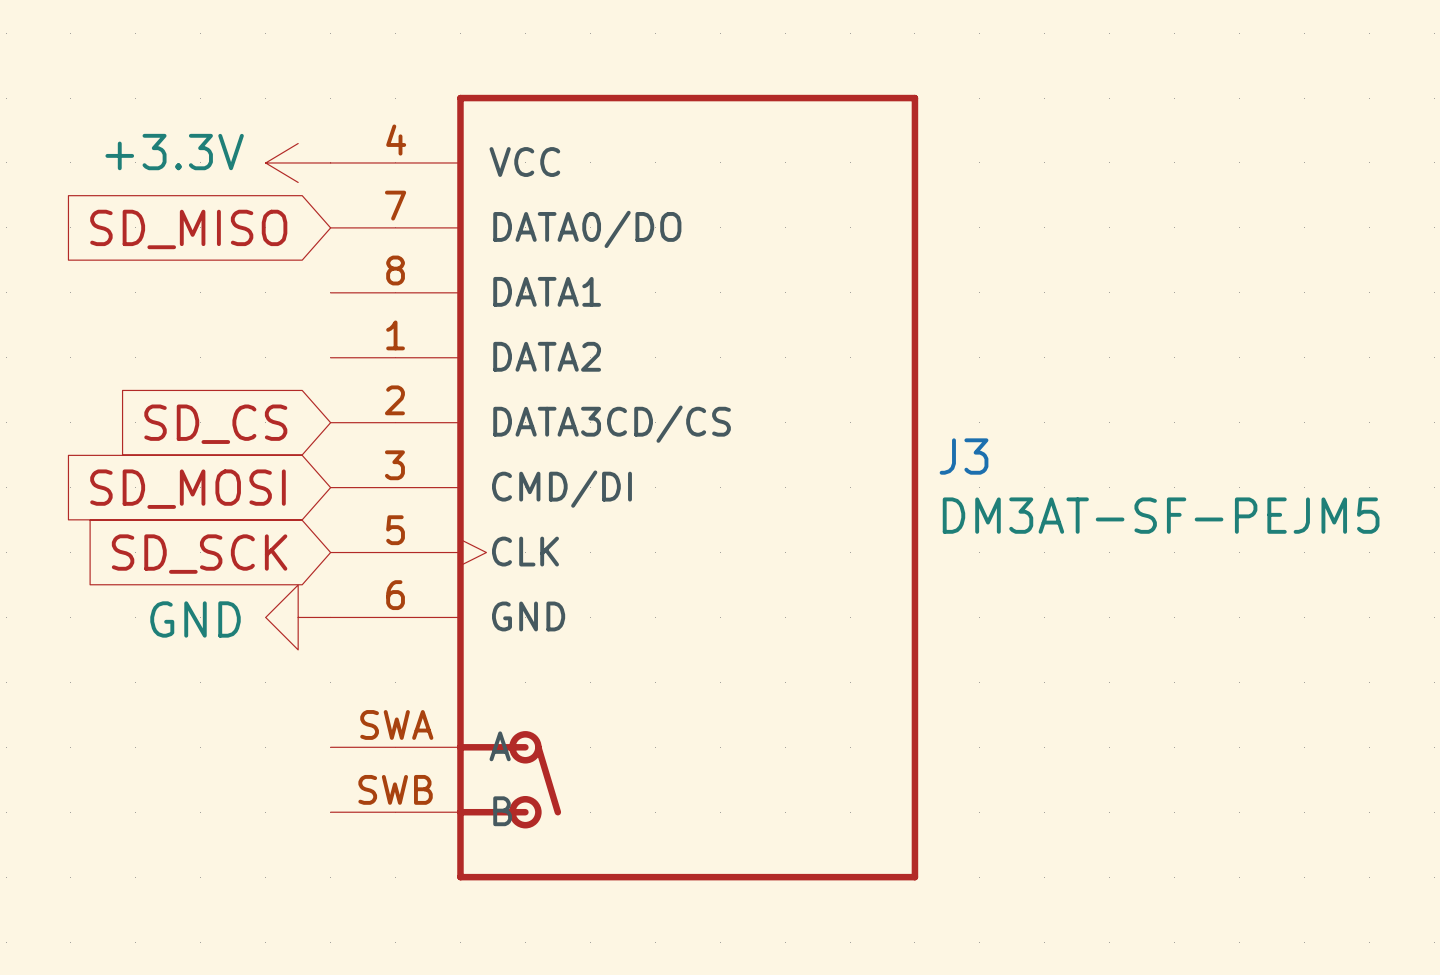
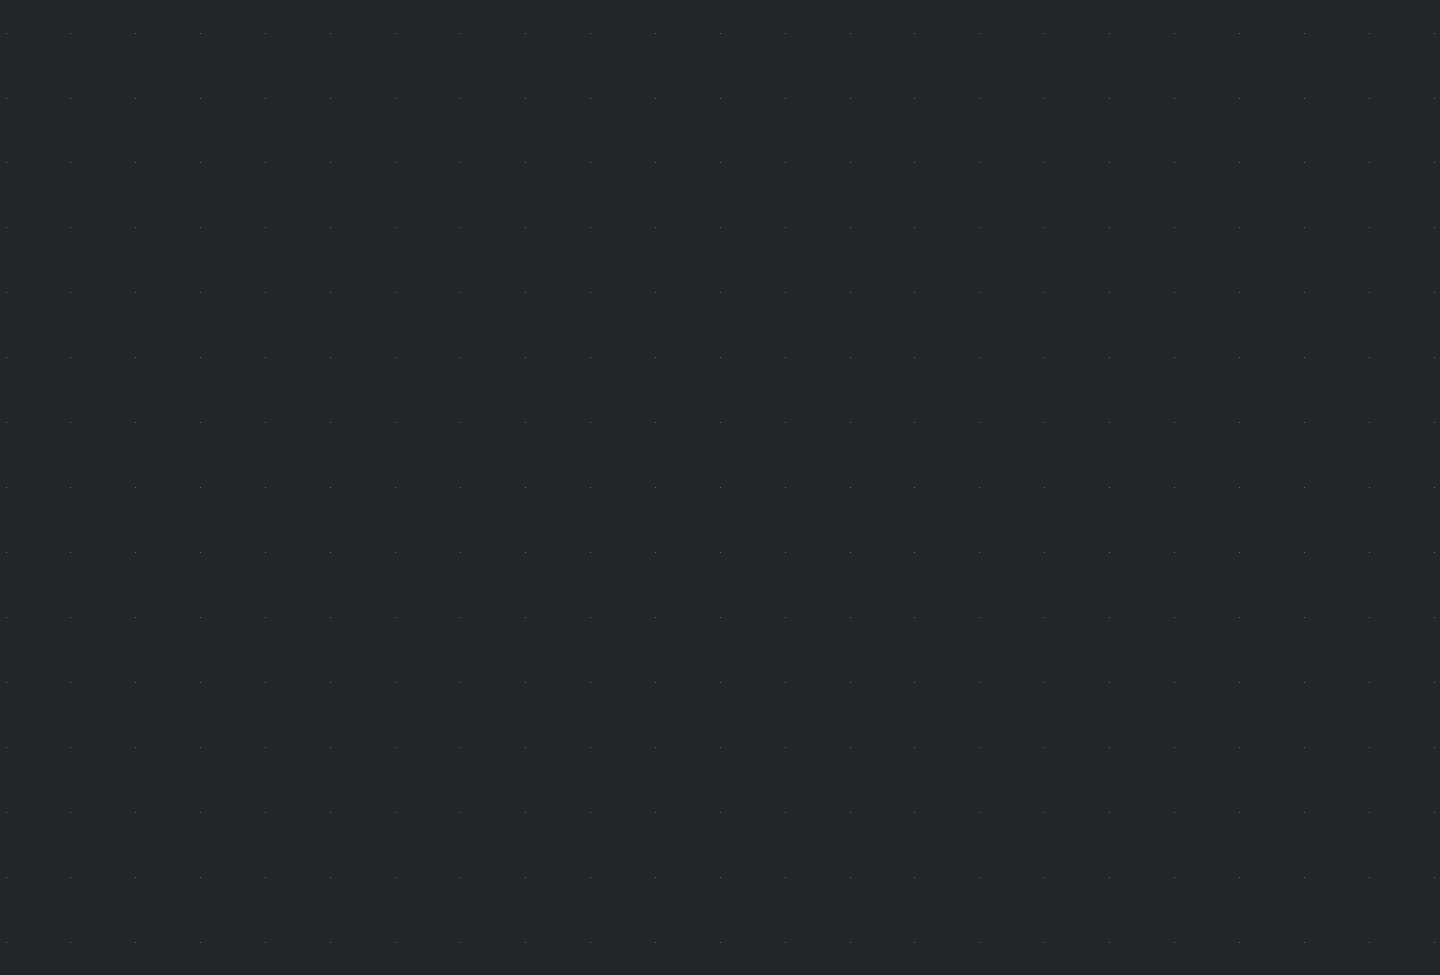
power symbol: +3.3V (298, 162) -> none
global label: SD_MISO (188, 229) -> none
global label: SD_CS (215, 424) -> none
J3: DM3AT-SF-PEJM5 (624, 487) -> none
global label: SD_MOSI (187, 489) -> none
global label: SD_SCK (199, 554) -> none
power symbol: GND (298, 617) -> none

